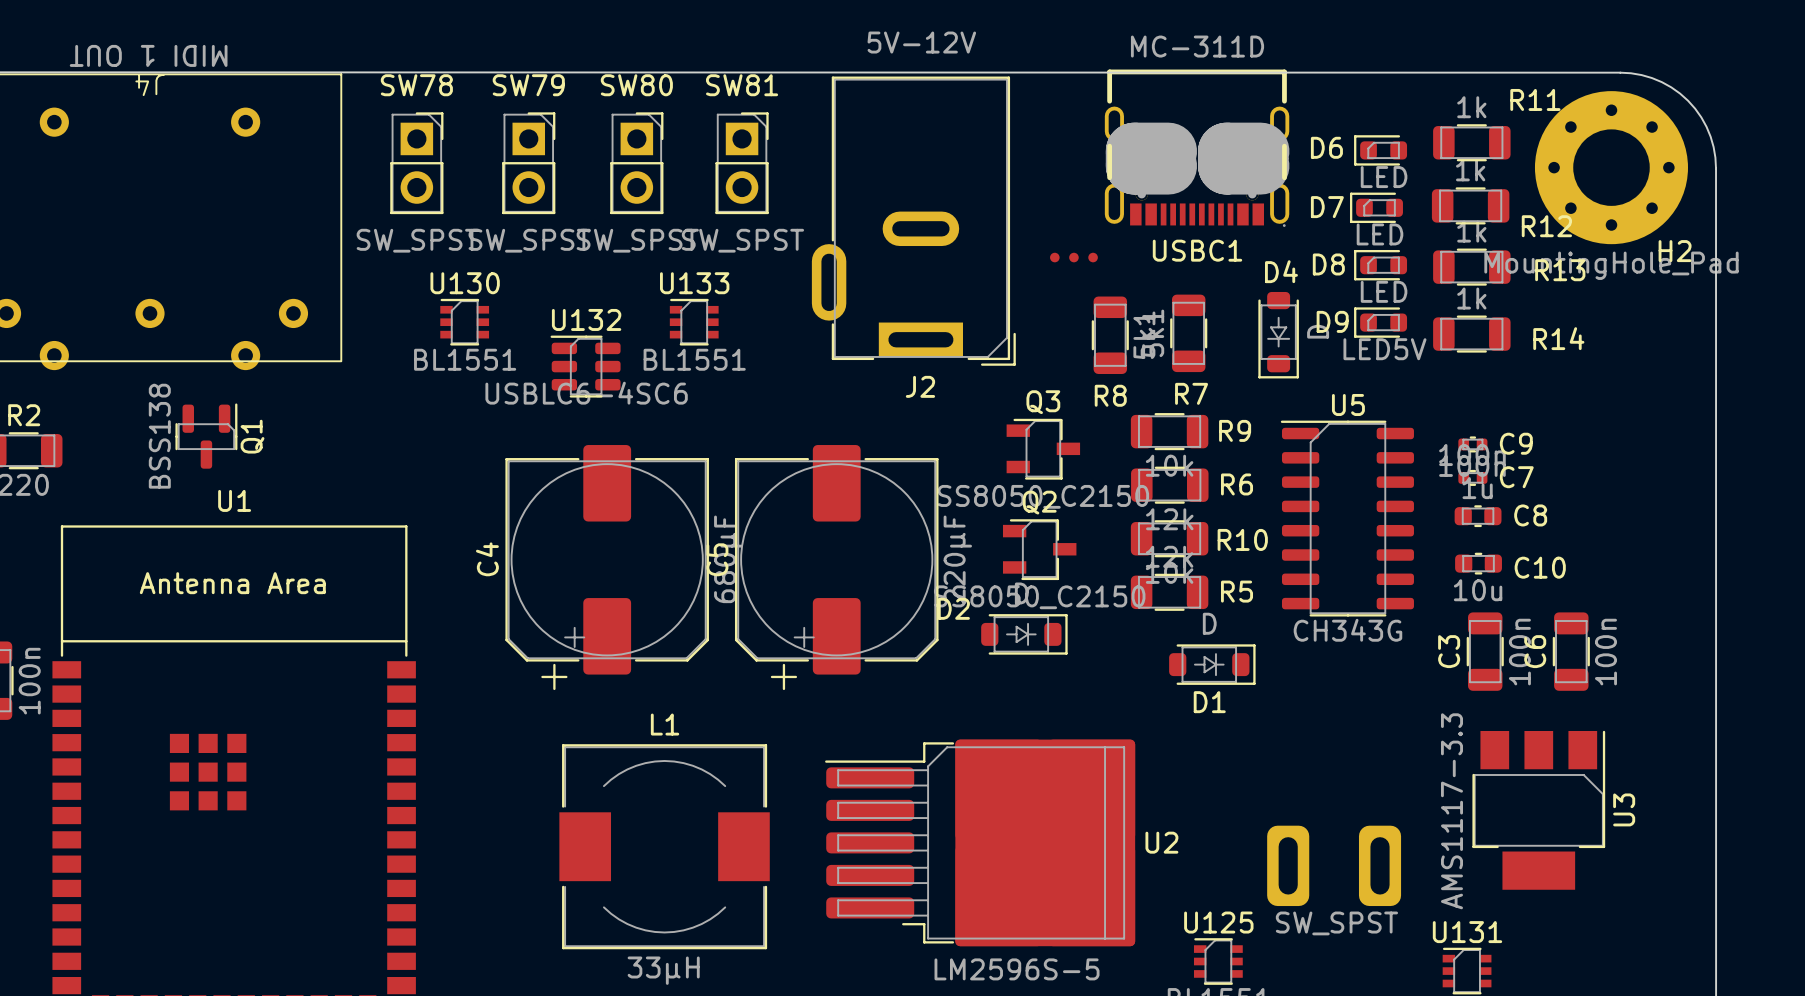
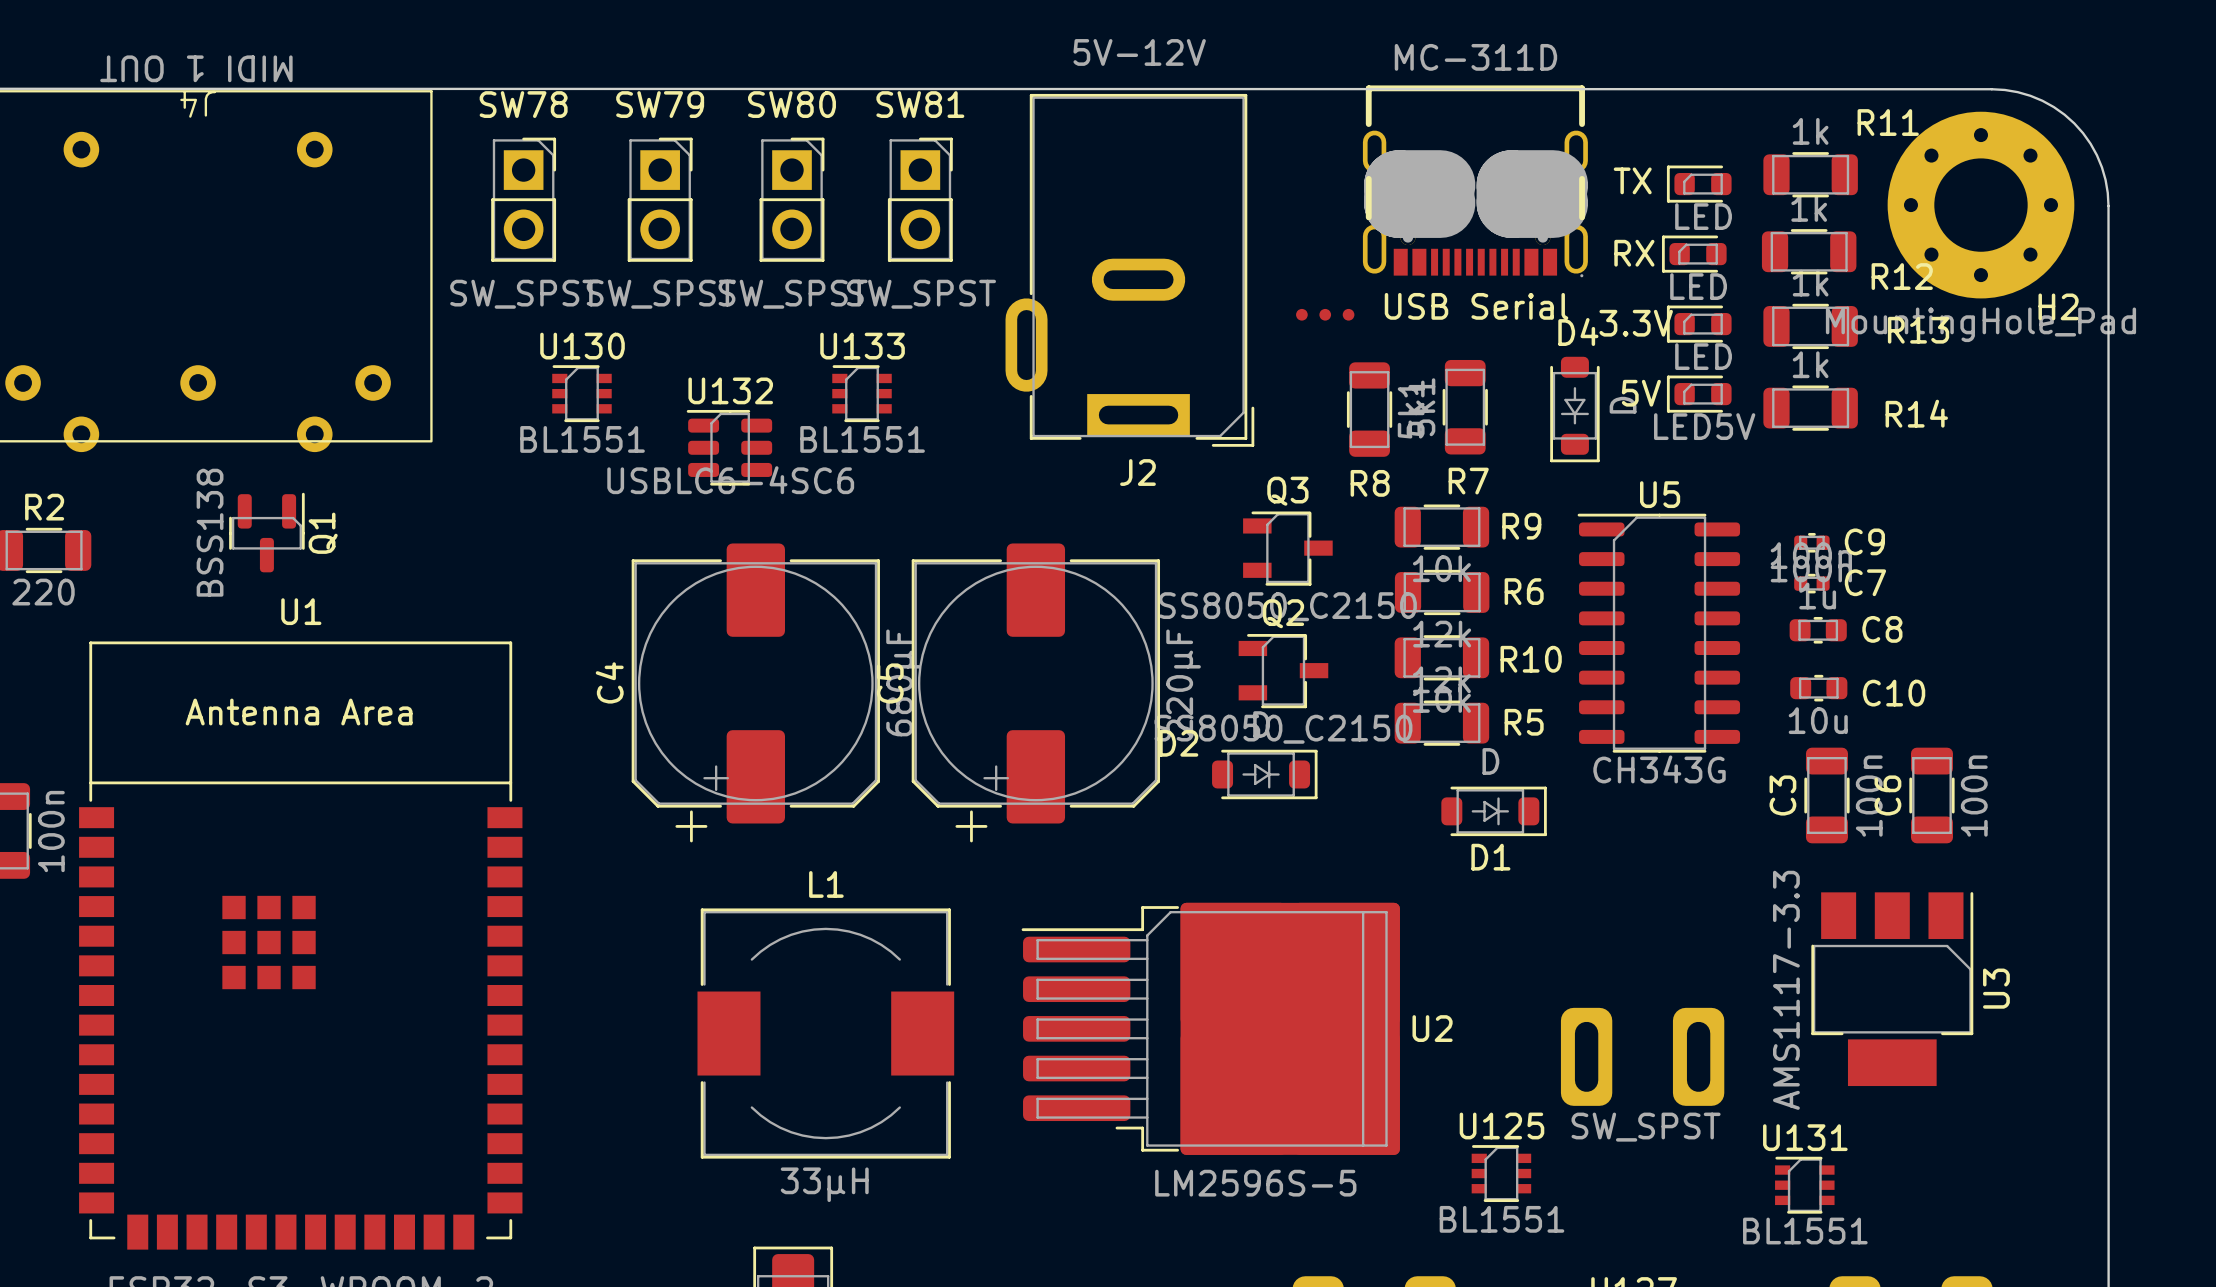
D6 name: D6 (1326, 147) -> TX (1632, 180)
D7 name: D7 (1327, 207) -> RX (1634, 253)
USBC1 name: USBC1 (1197, 250) -> USB Serial (1476, 306)
D8 name: D8 (1328, 264) -> 3.3V (1636, 323)
D9 name: D9 (1332, 321) -> 5V (1641, 393)

